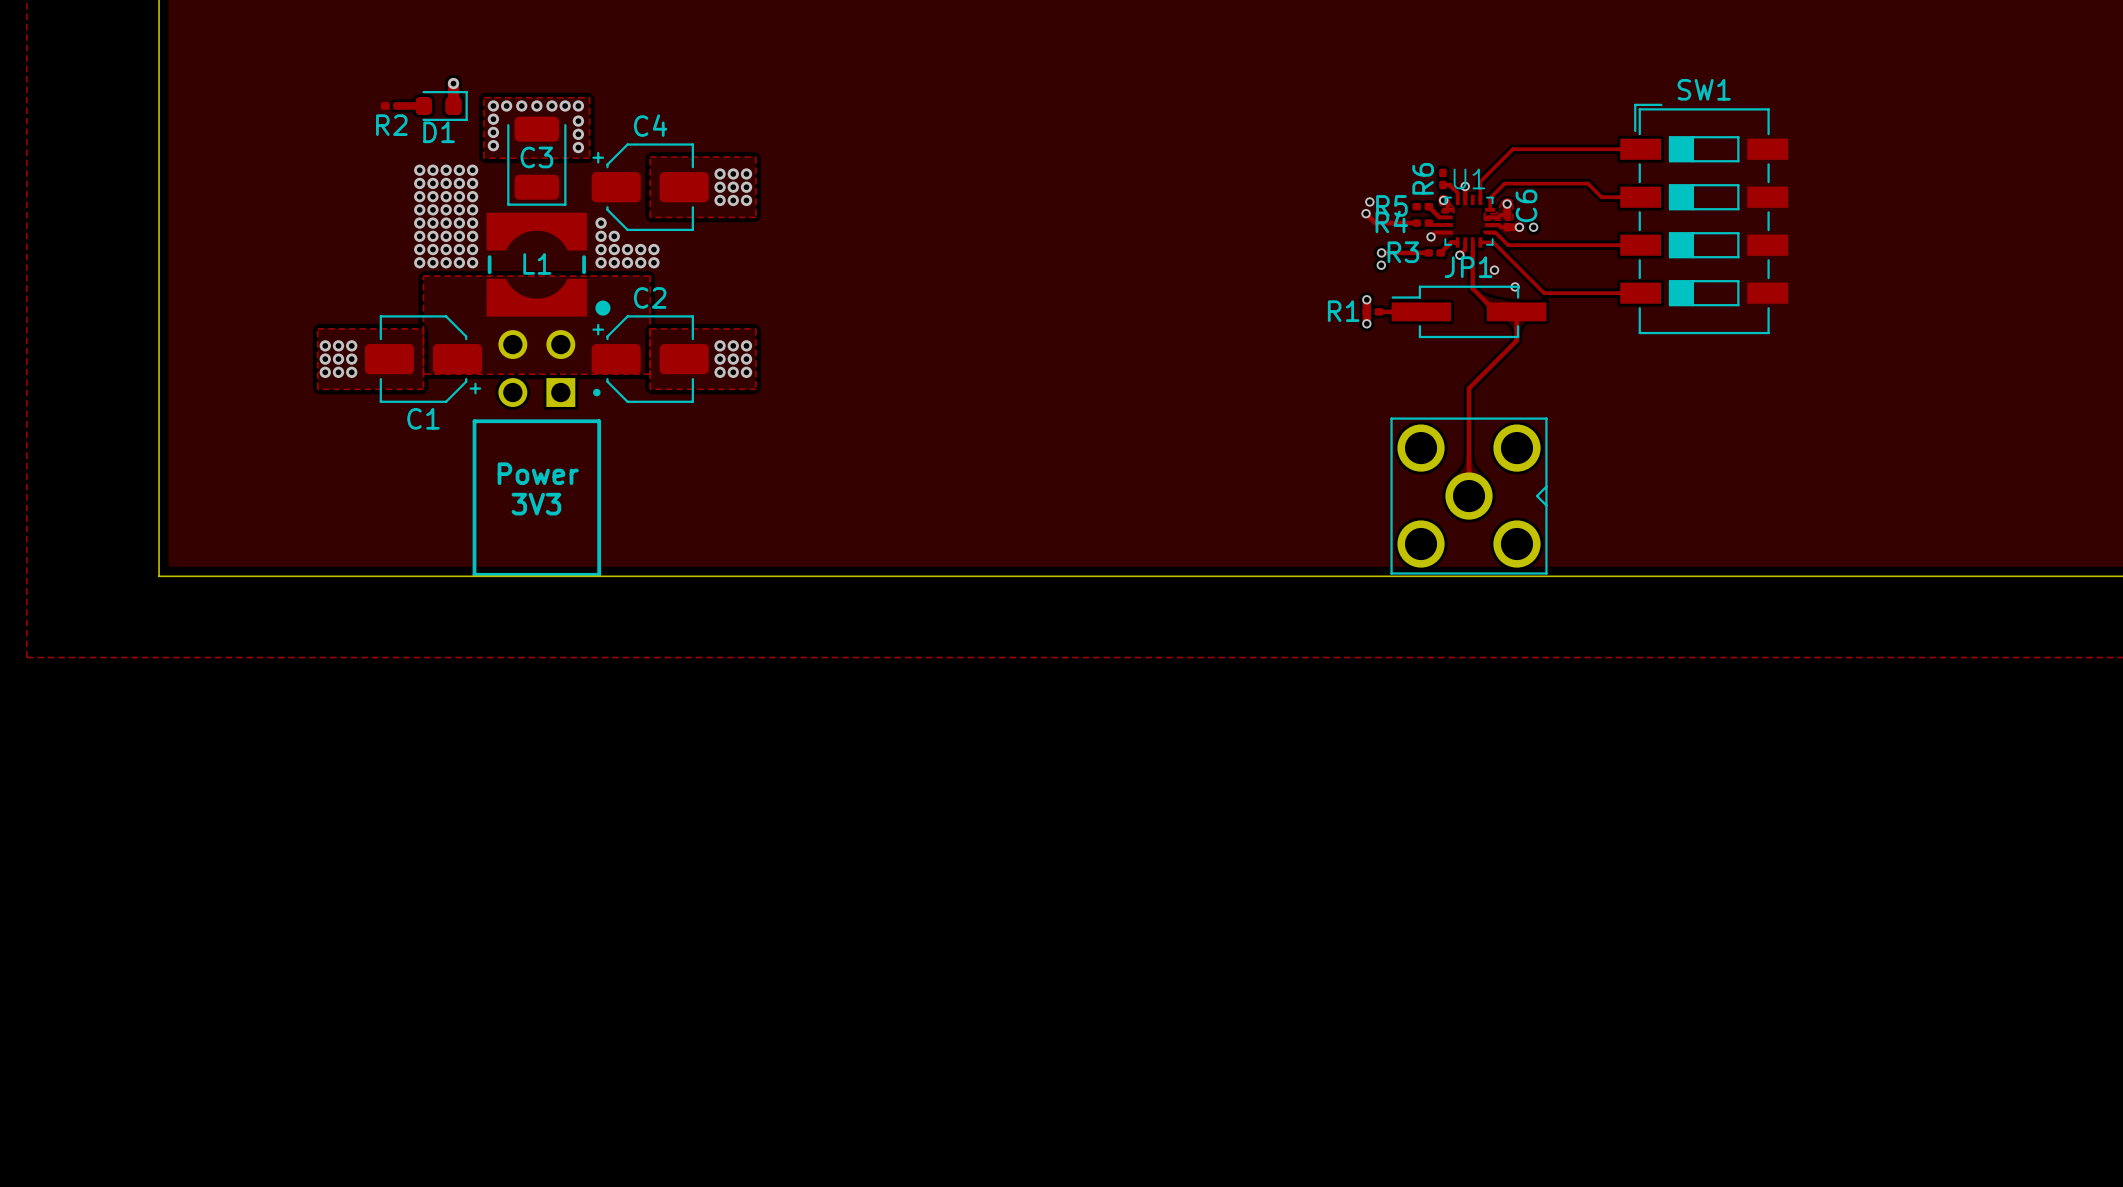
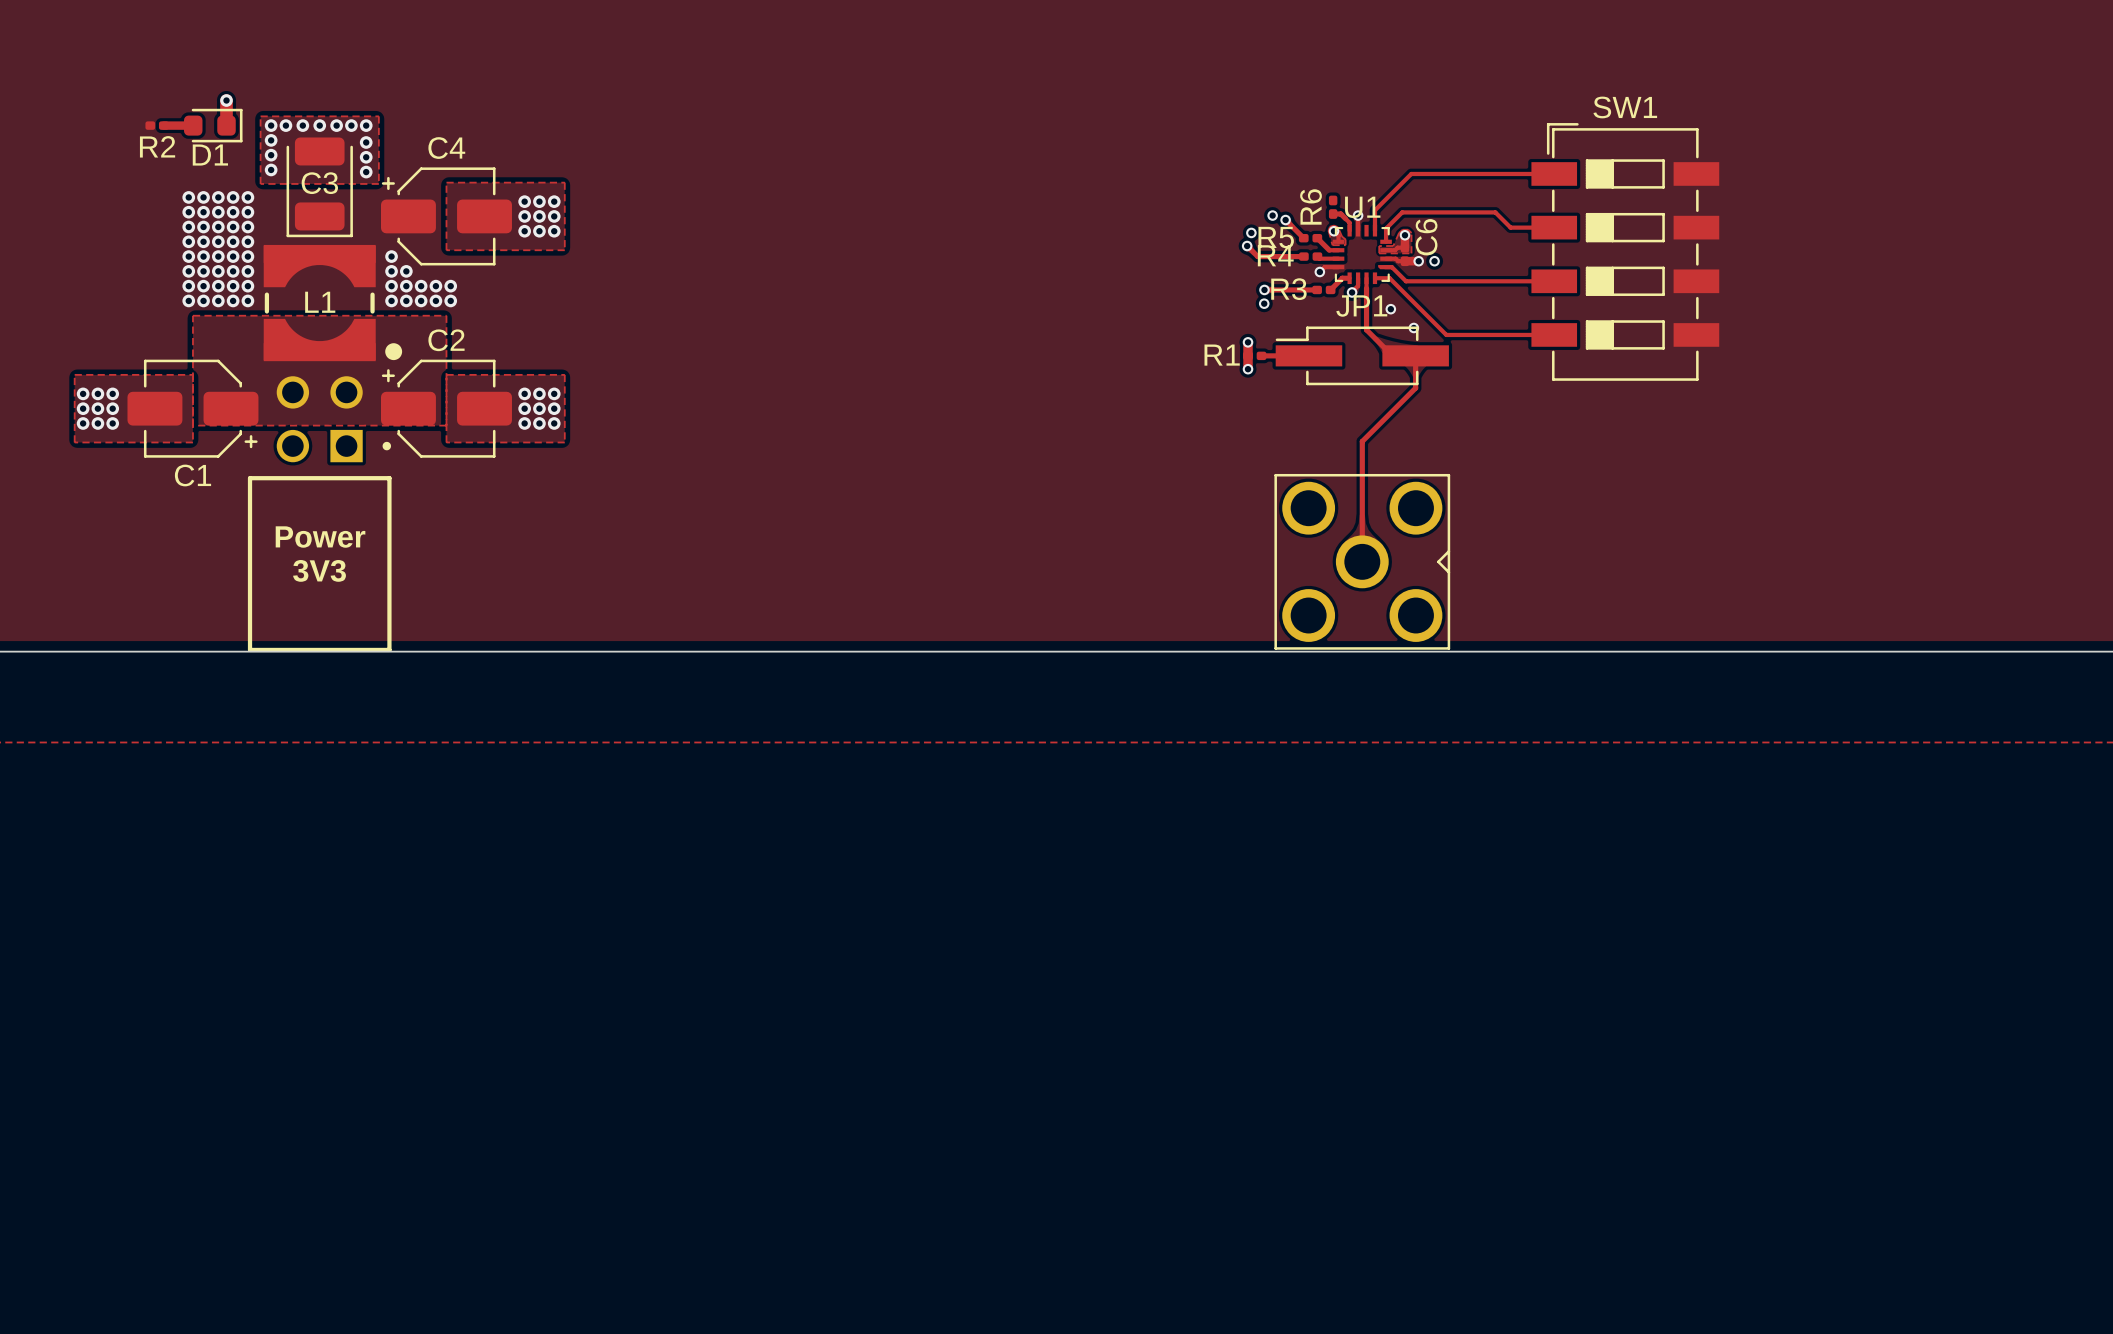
via: none -> (1272, 215)
track: none -> (1285, 220) (1303, 238)
via: none -> (1285, 220)

